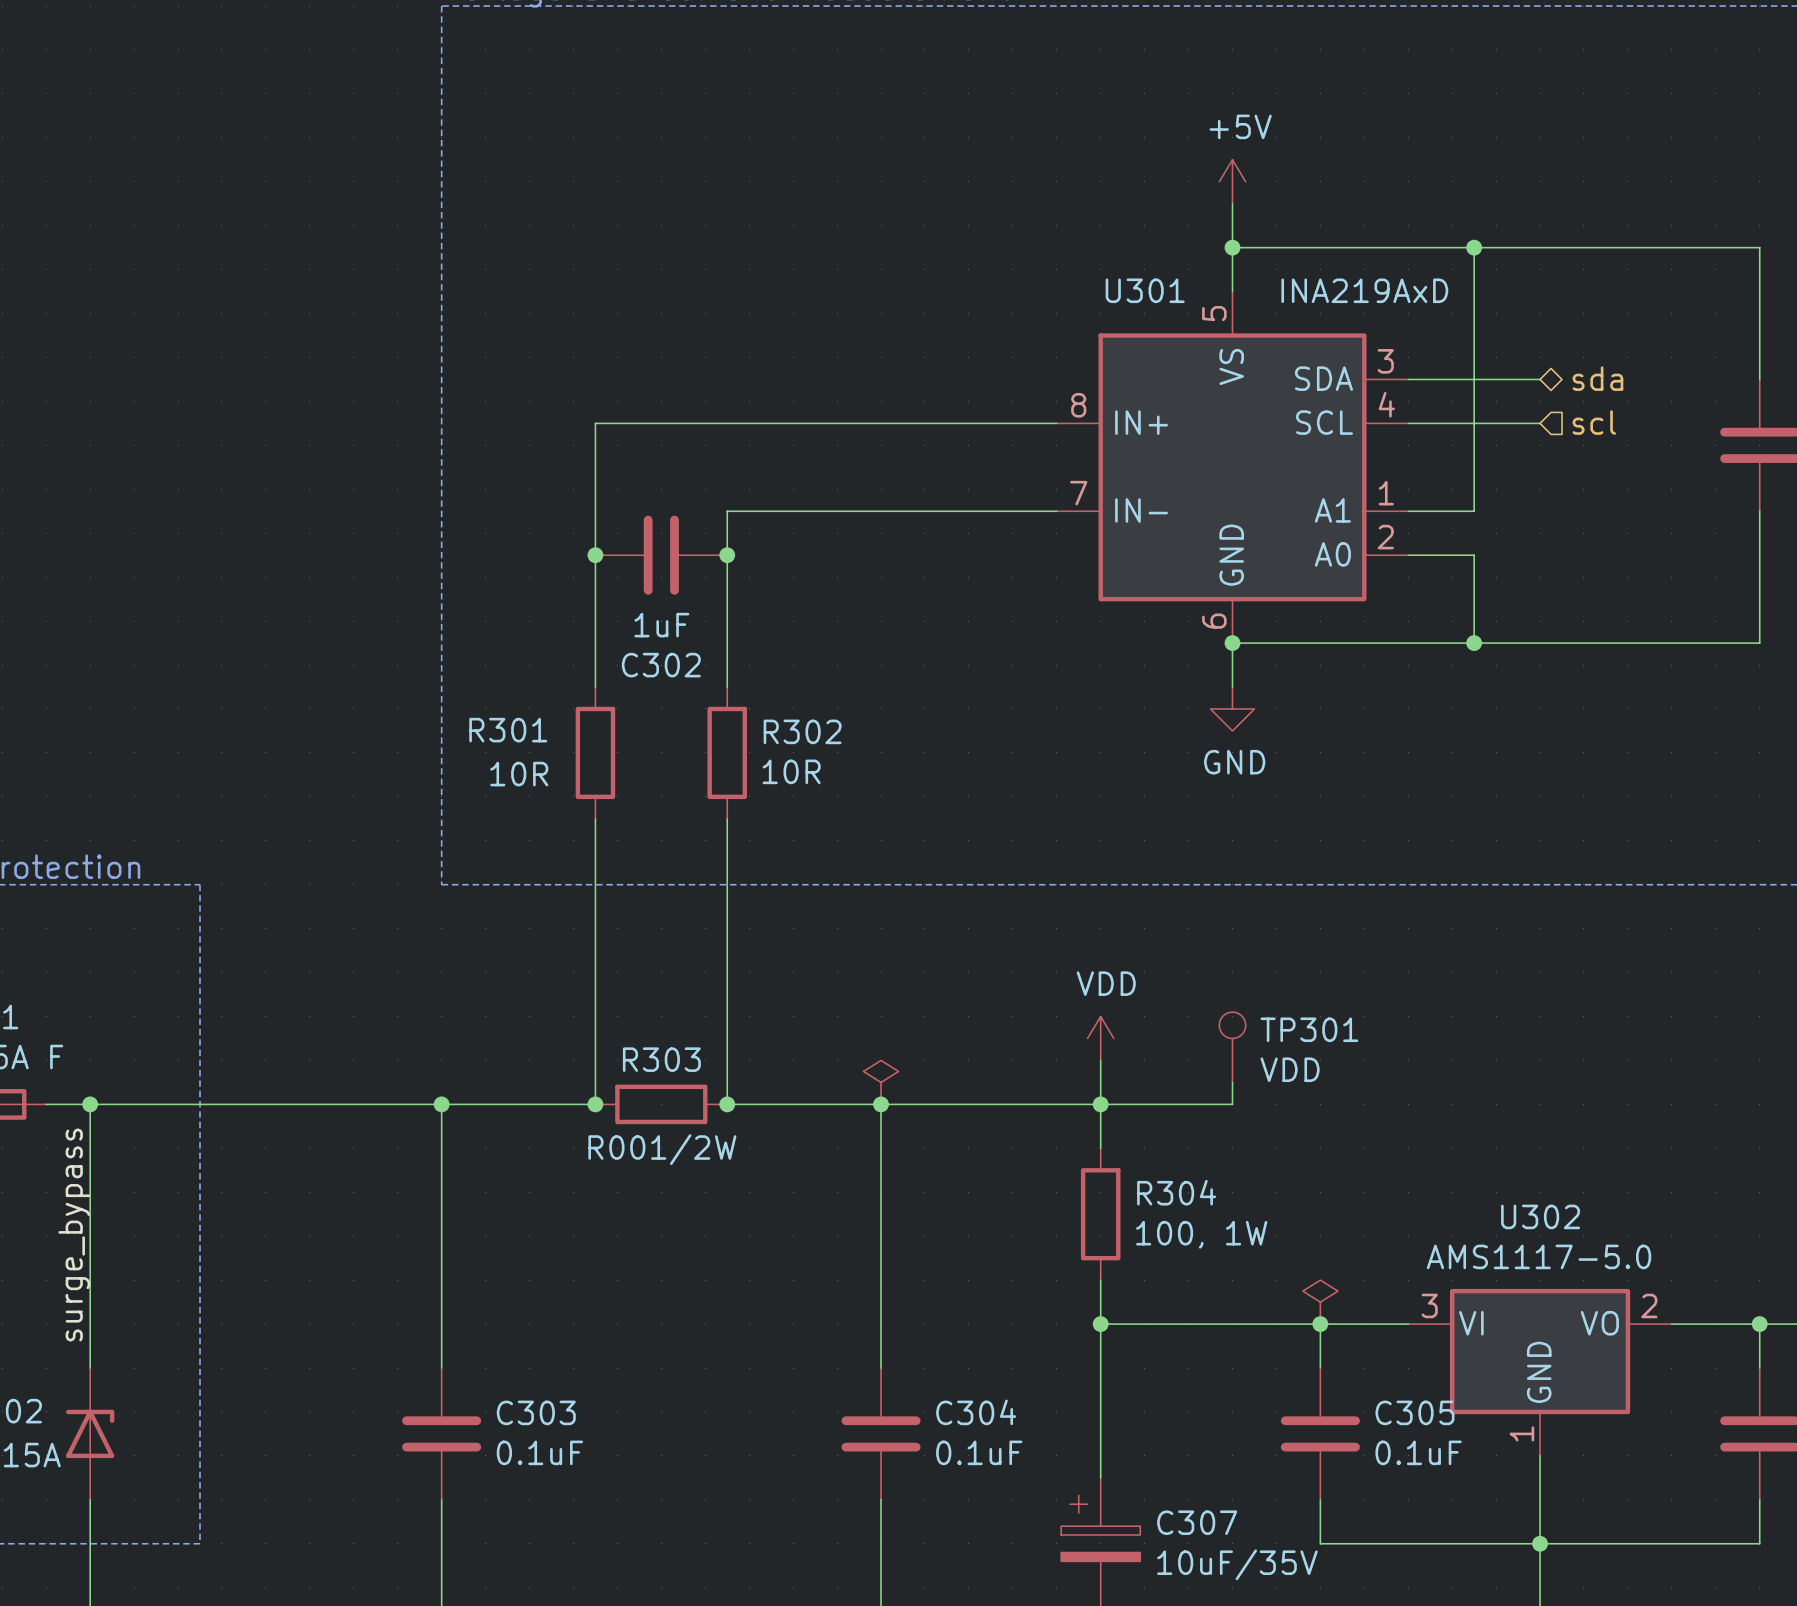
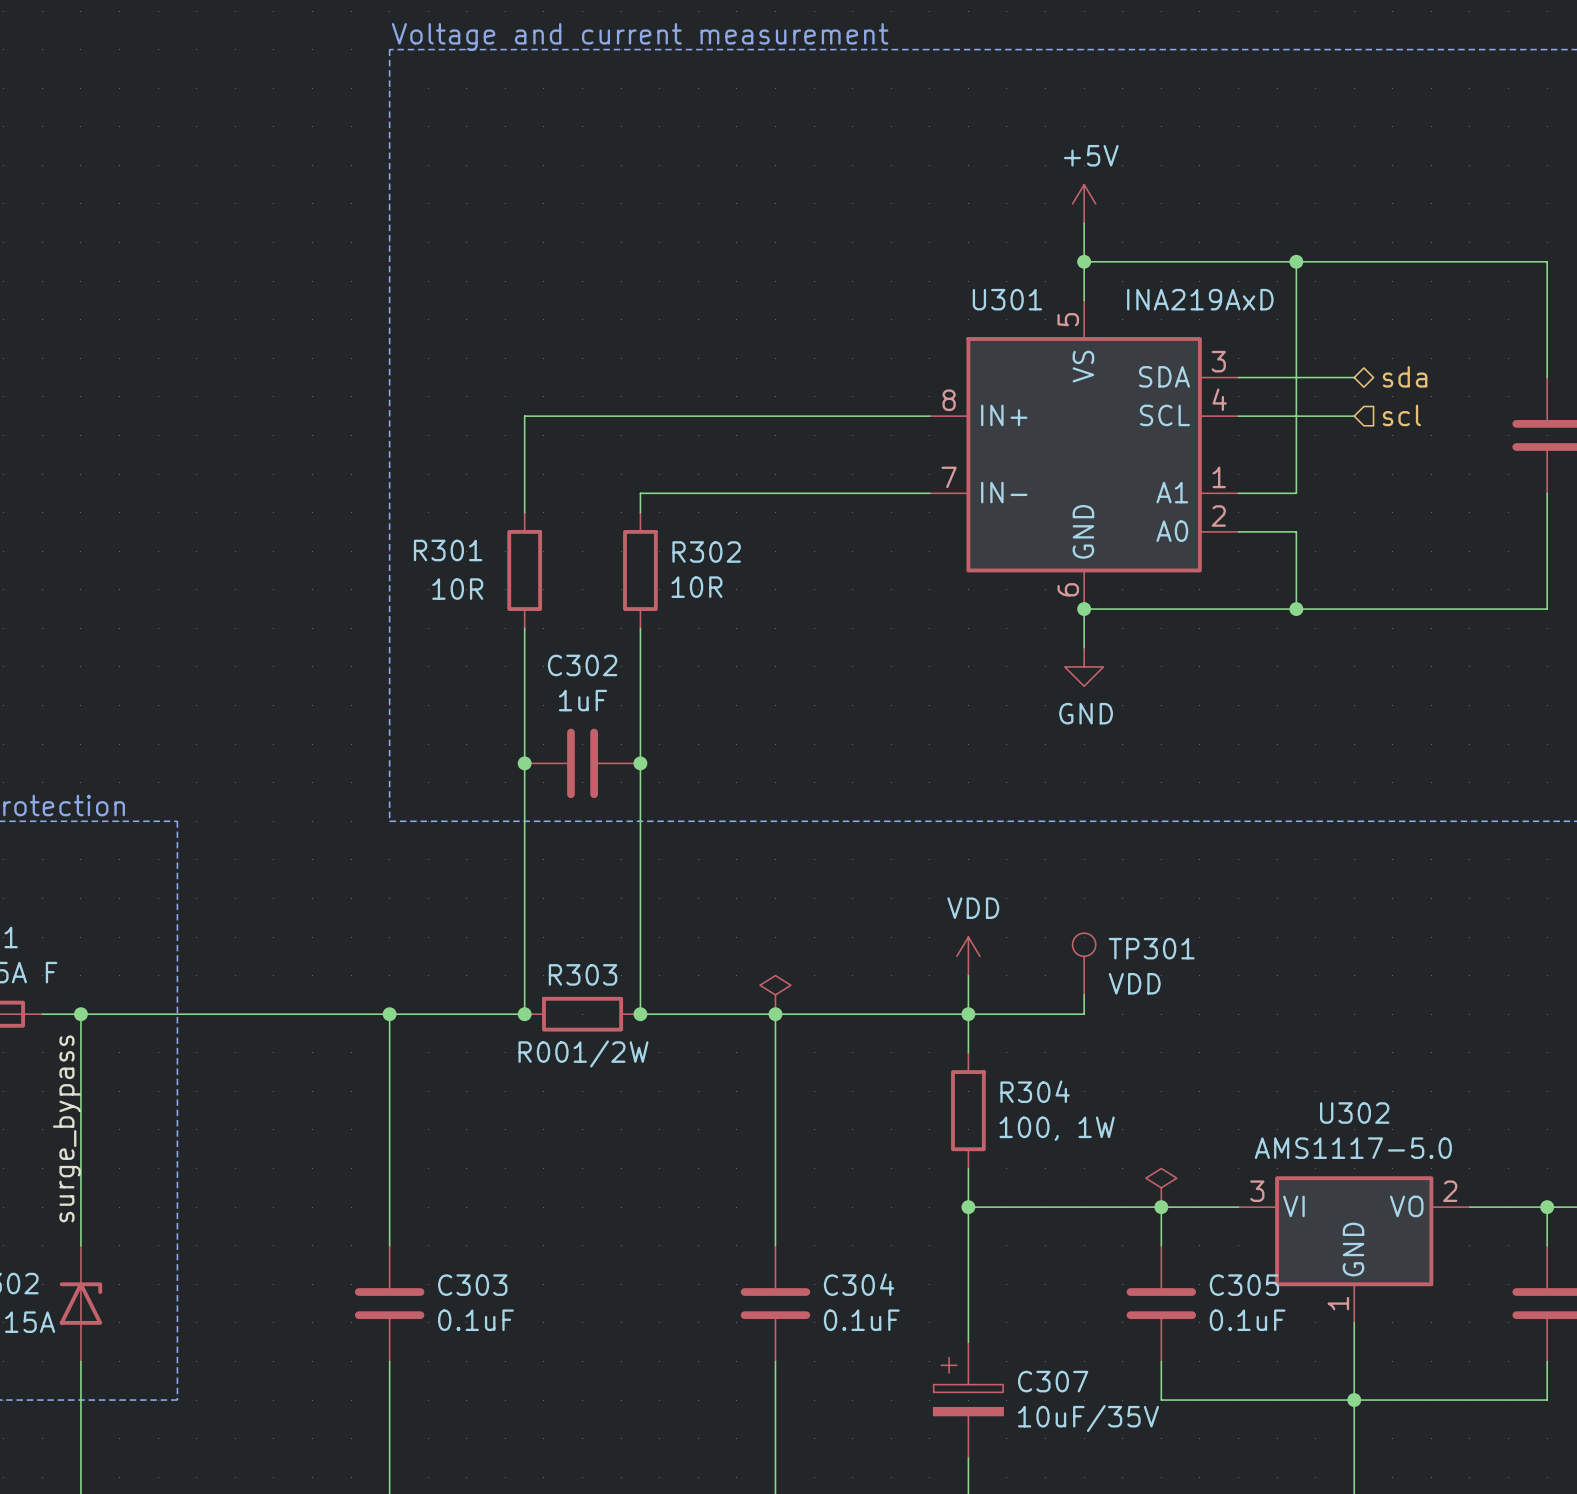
wire: (595, 533) (595, 665) -> (524, 647) (524, 763)
wire: (727, 533) (727, 665) -> (640, 647) (640, 763)
junction: (595, 555) -> none
C302 position: (661, 555) -> (582, 763)
junction: (727, 555) -> none
C302 value position: 1uF (661, 625) -> 1uF (583, 700)
C302 name position: C302 (661, 665) -> C302 (582, 665)
R301 position: (595, 752) -> (524, 570)
R302 position: (727, 752) -> (640, 570)
junction: none -> (524, 763)
junction: none -> (640, 763)

